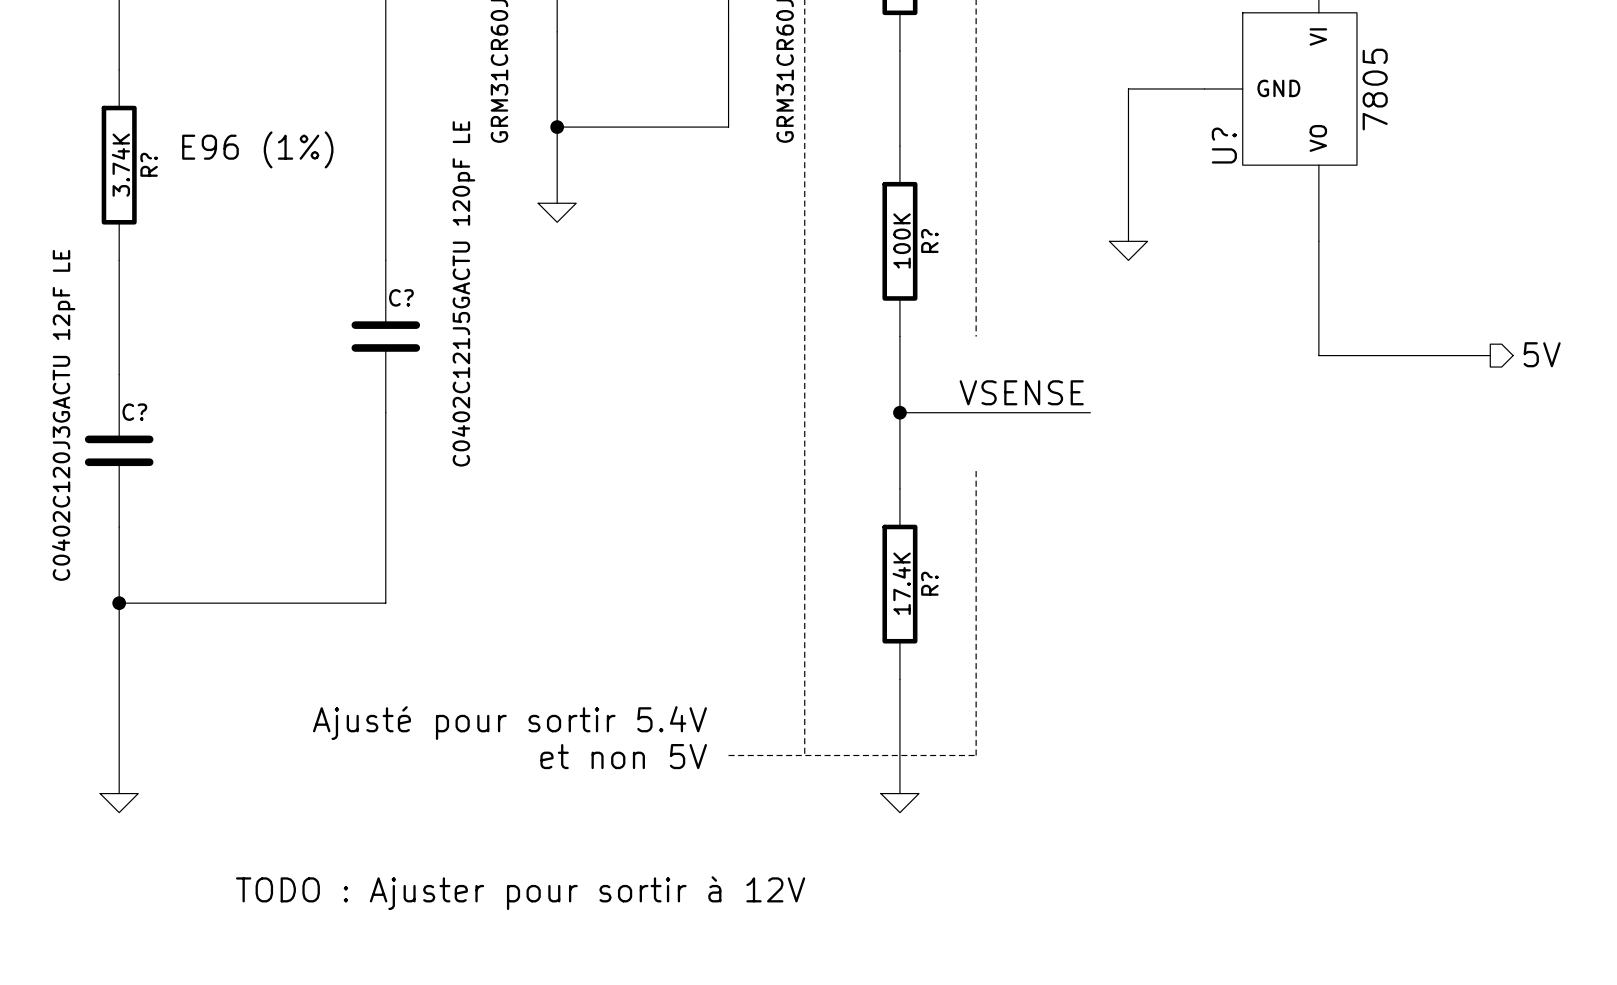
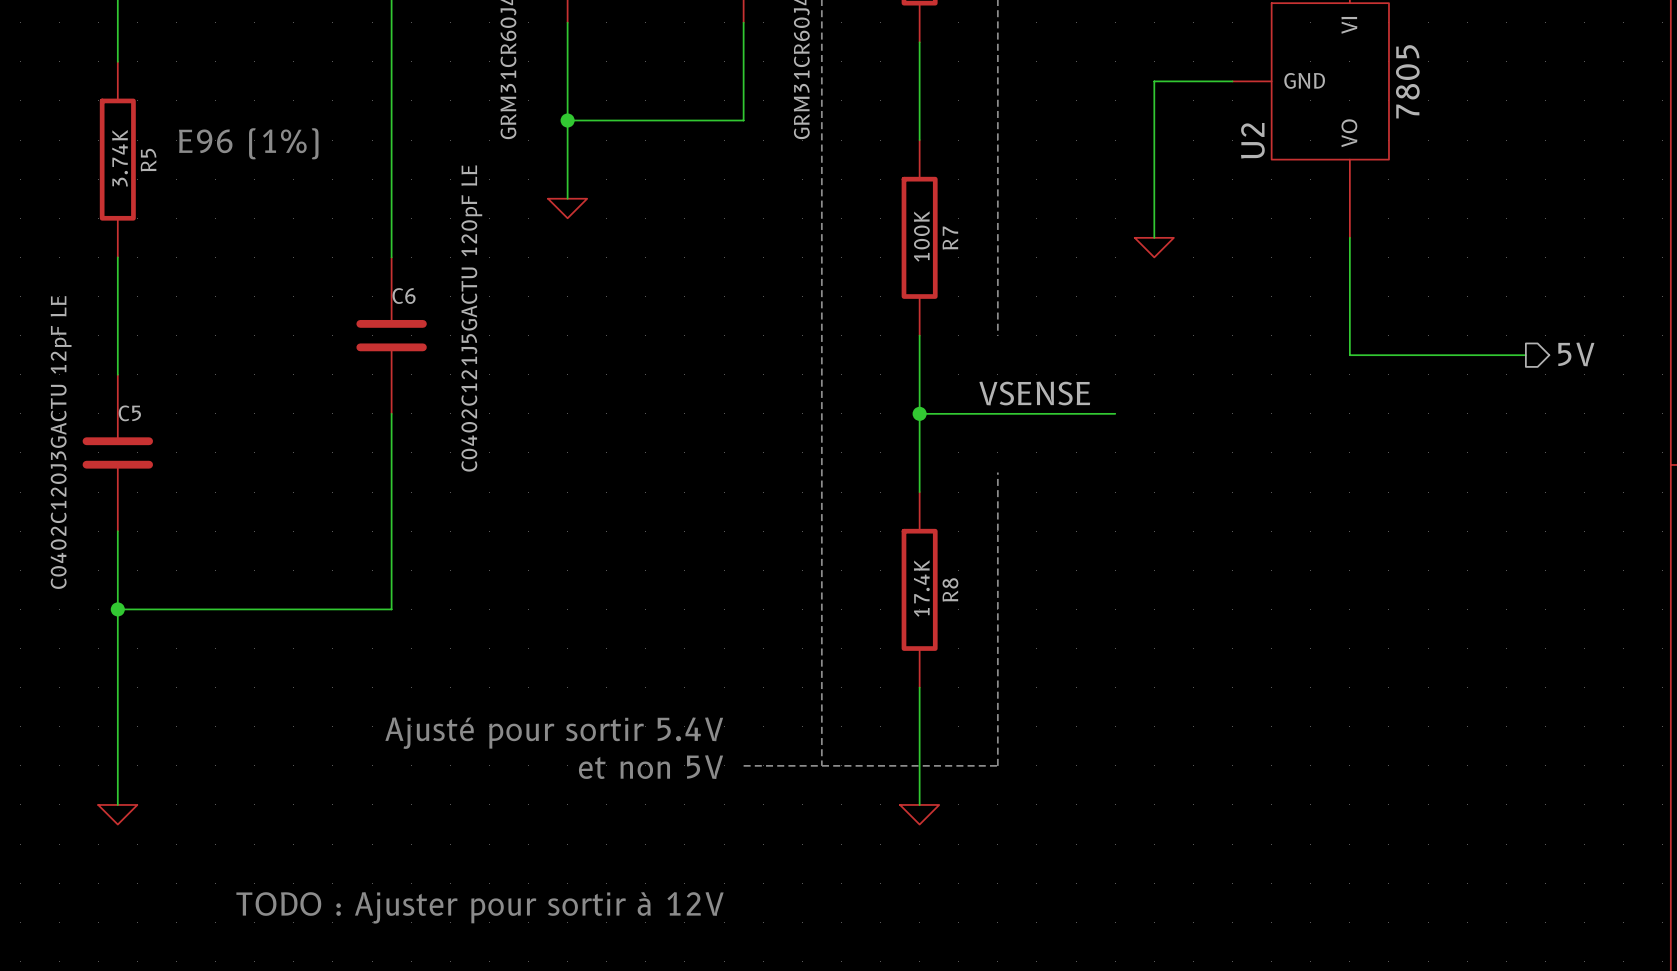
U? name: U? (1224, 145) -> U2 (1252, 140)
R? name: R? (149, 164) -> R5 (148, 160)
R? name: R? (929, 240) -> R7 (950, 238)
C? name: C? (401, 297) -> C6 (404, 296)
C? name: C? (134, 412) -> C5 (129, 413)
R? name: R? (929, 583) -> R8 (950, 589)

